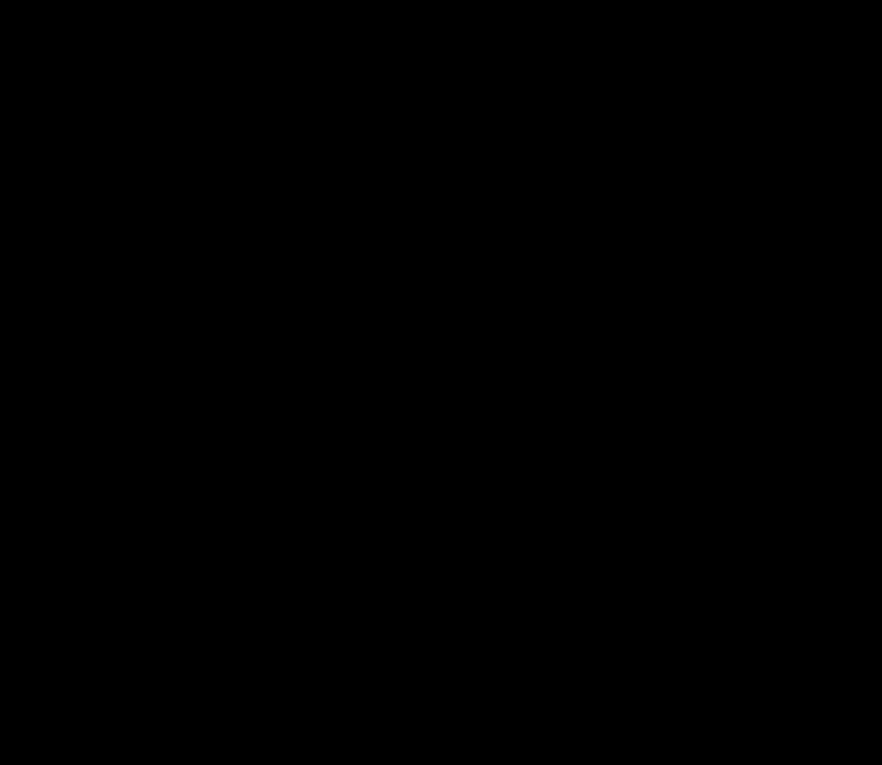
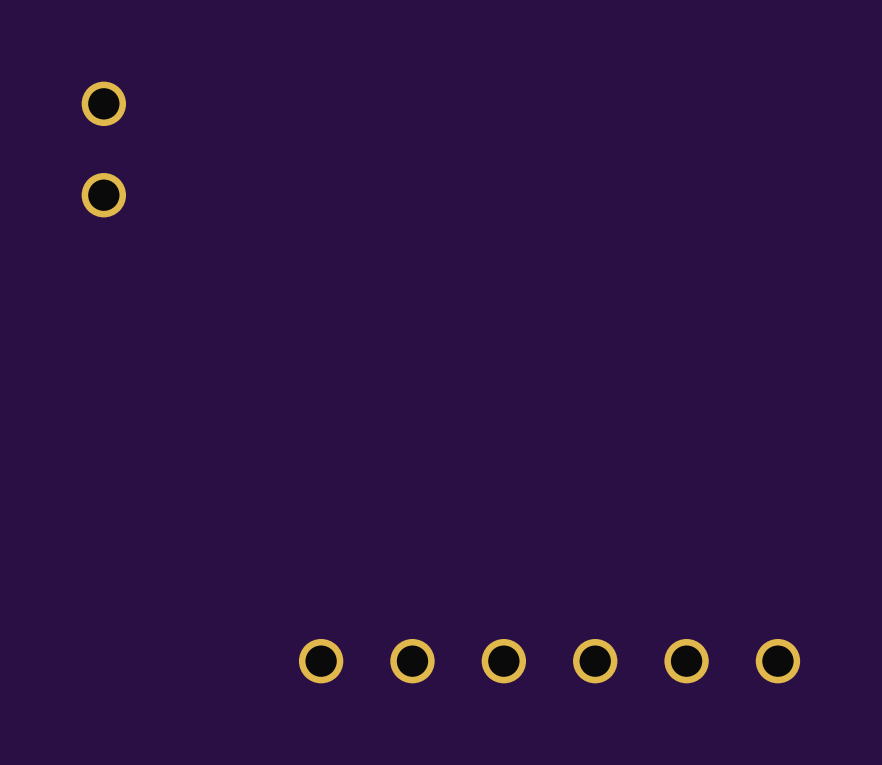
part: none -> (103, 149)
part: none -> (366, 661)
part: none -> (549, 661)
part: none -> (732, 661)

